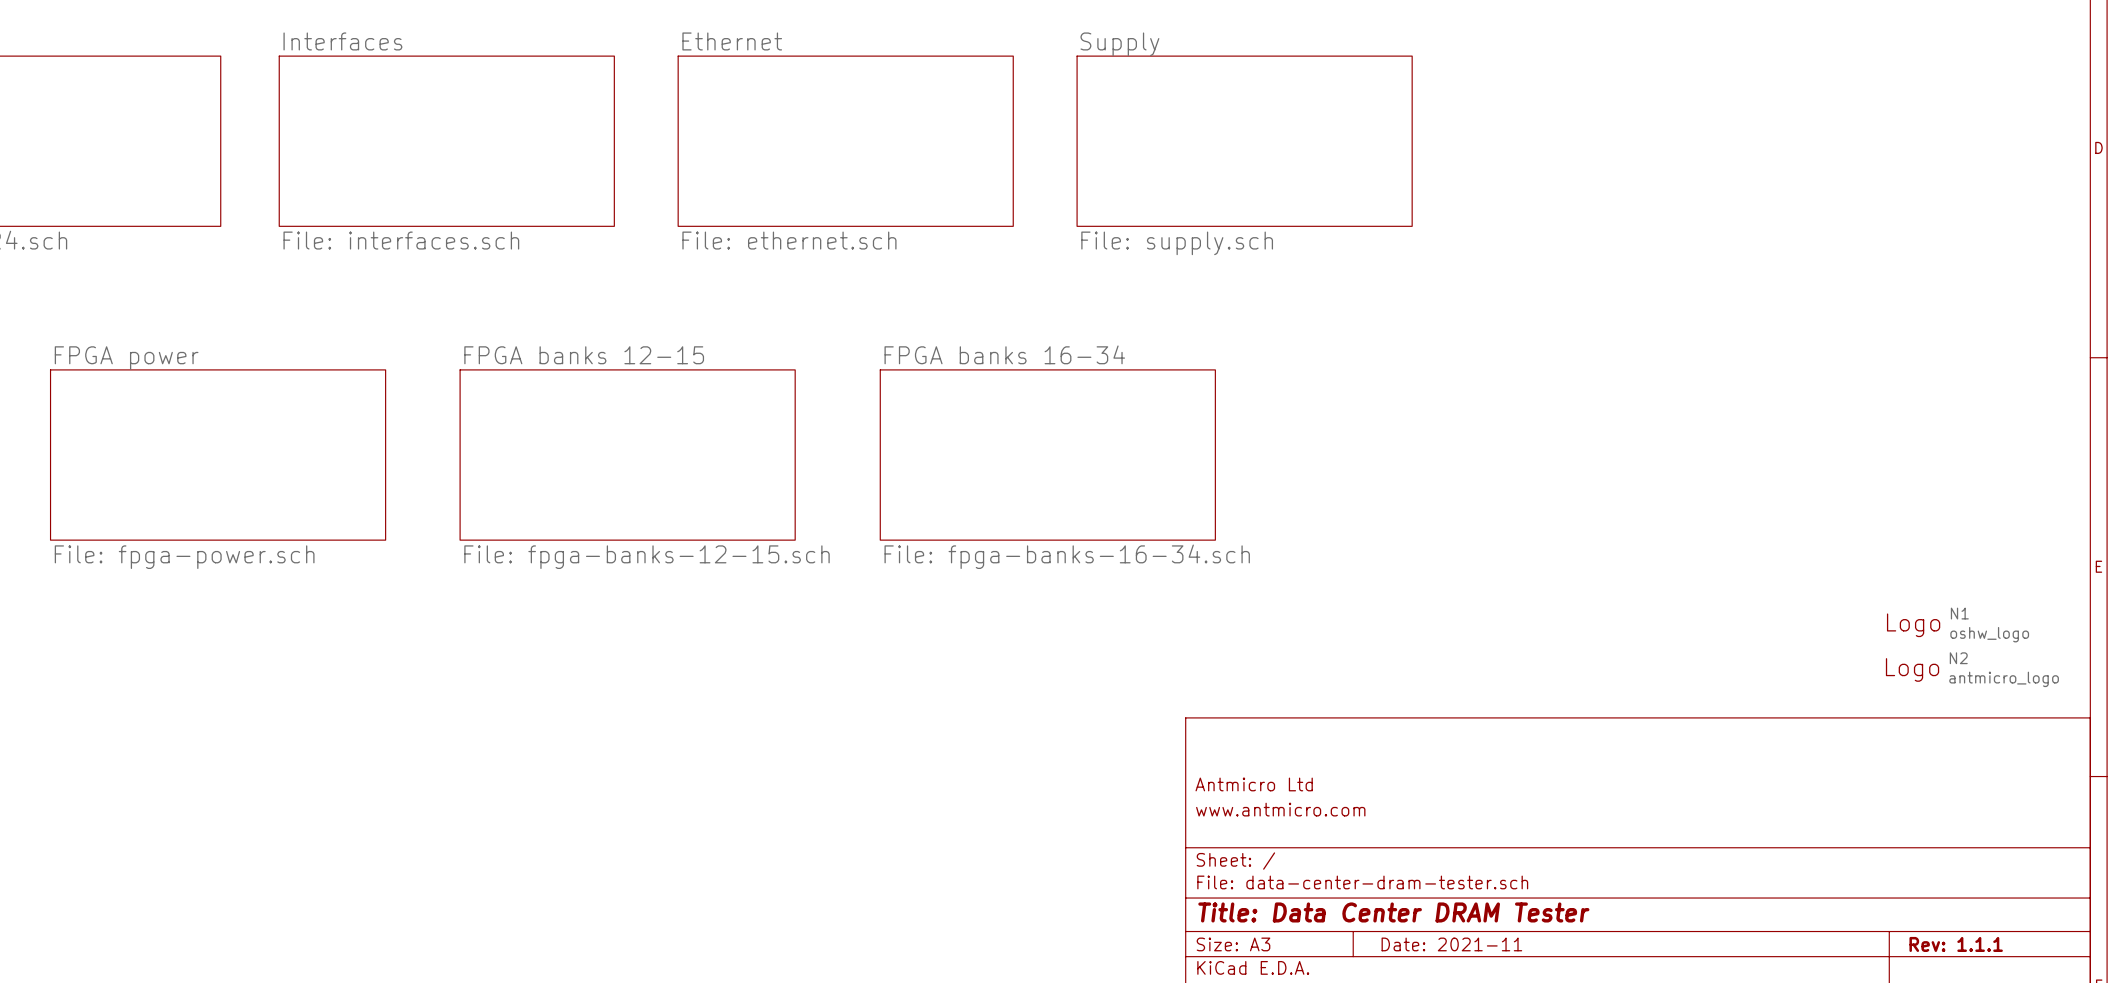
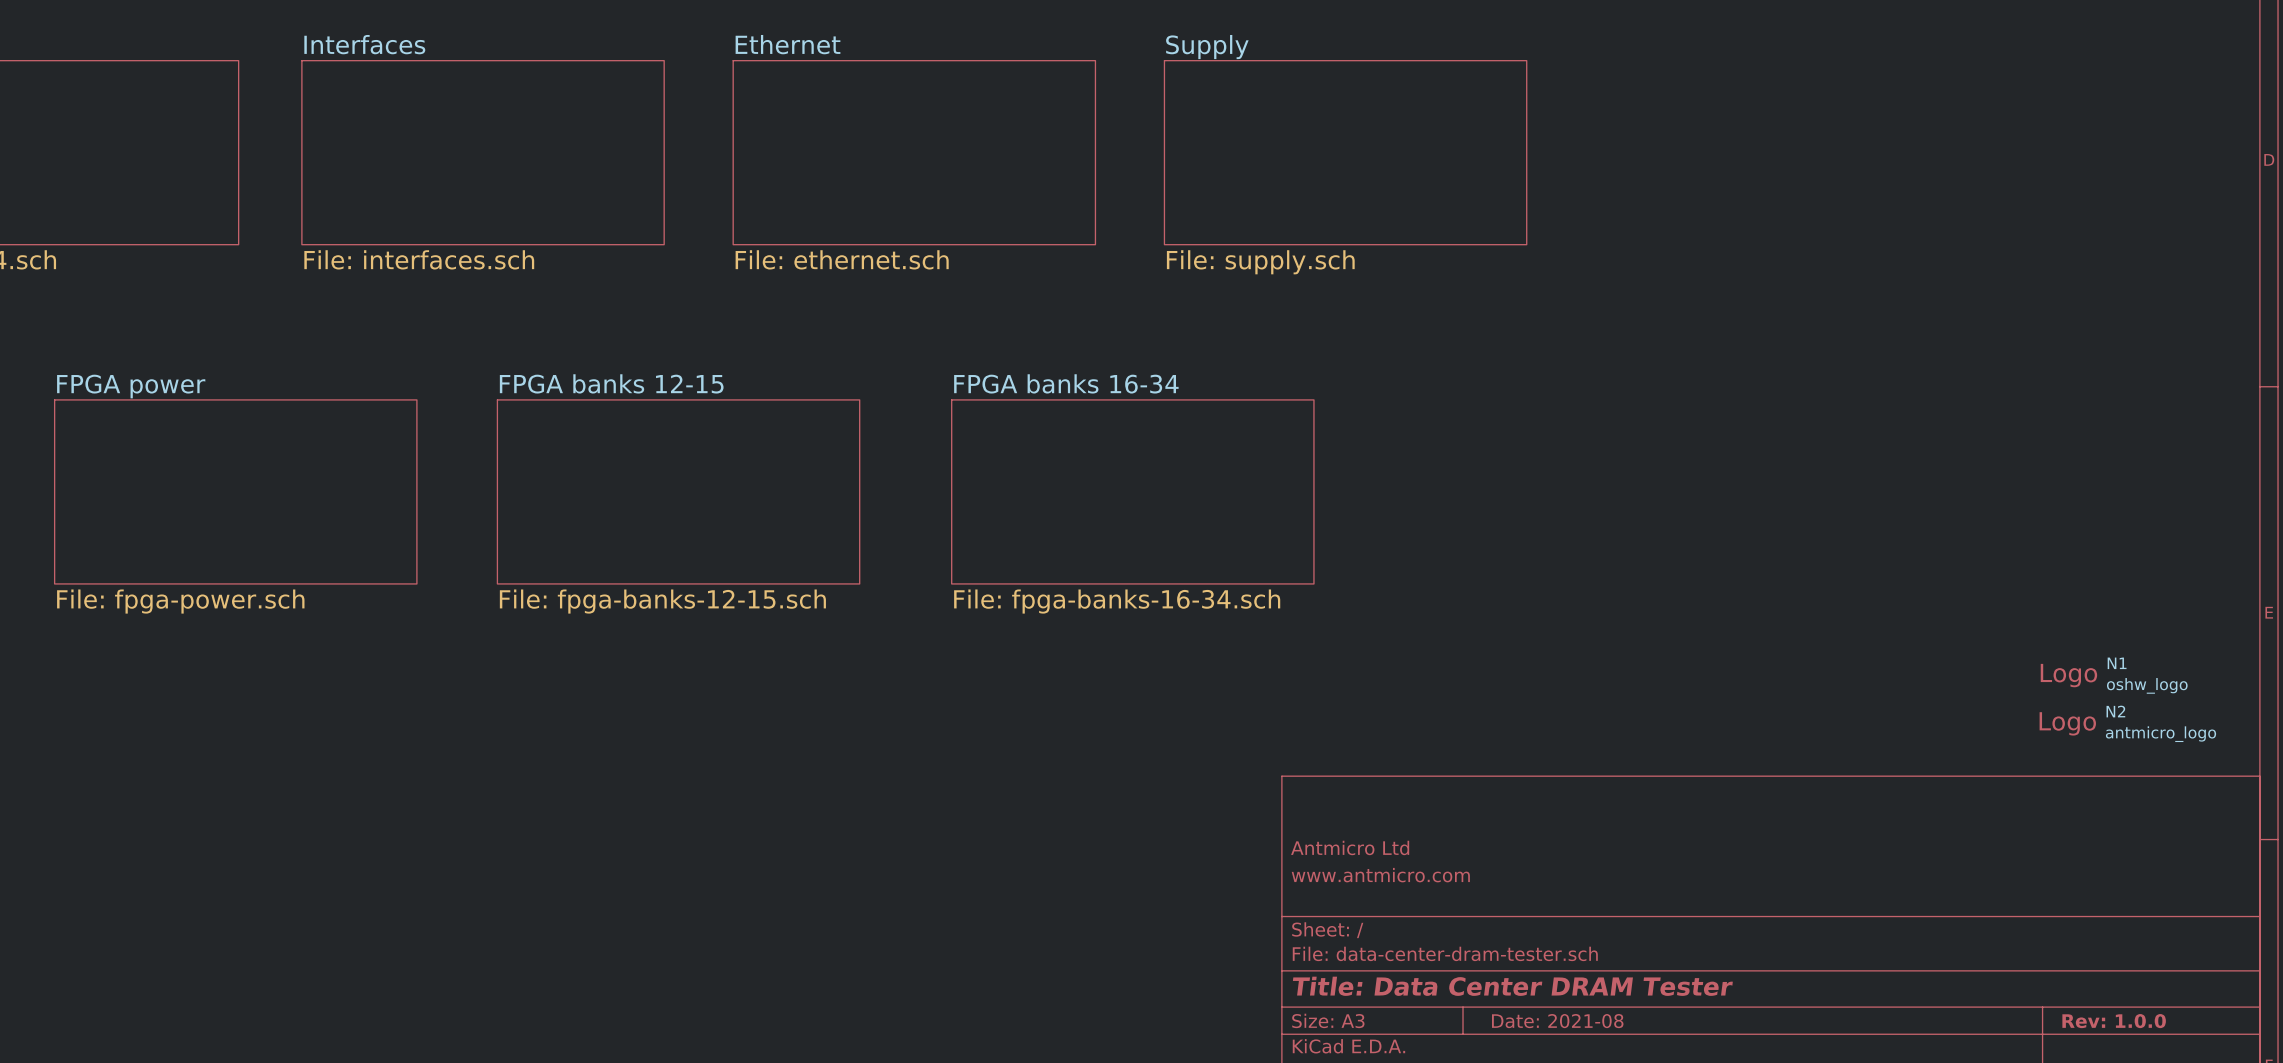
title block: Date: 2021-11 (1451, 944) -> Date: 2021-08 (1557, 1021)
title block: Rev: 1.1.1 (1956, 944) -> Rev: 1.0.0 (2114, 1021)

